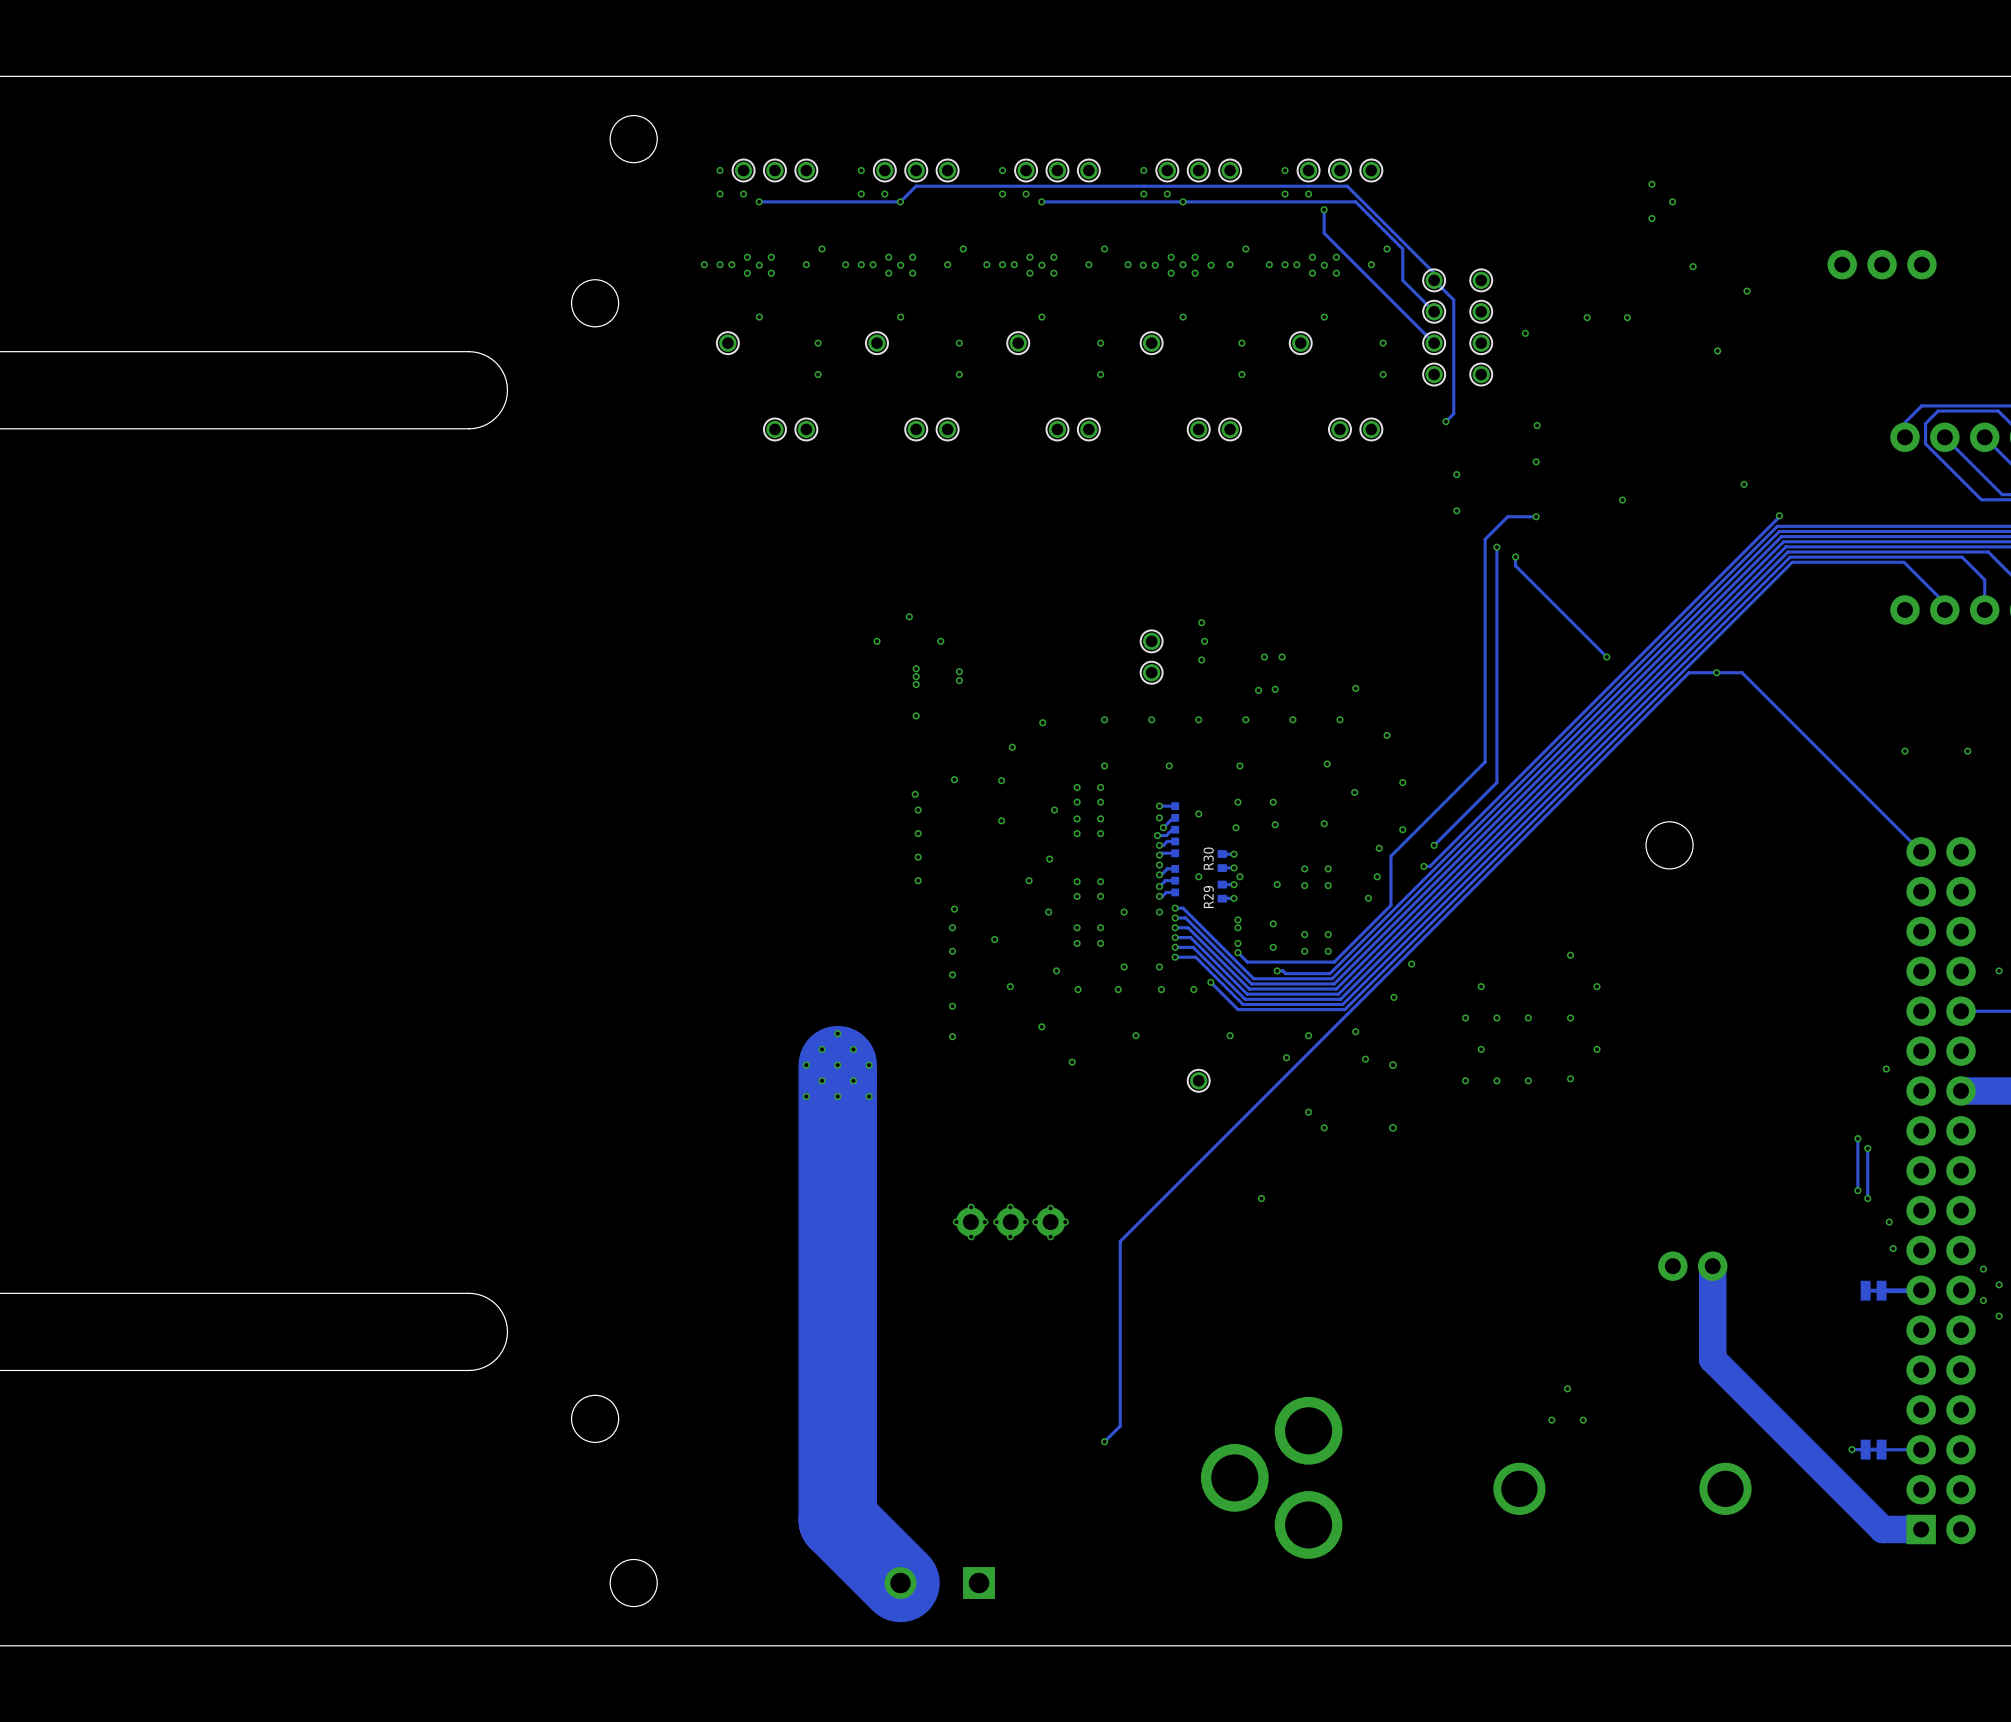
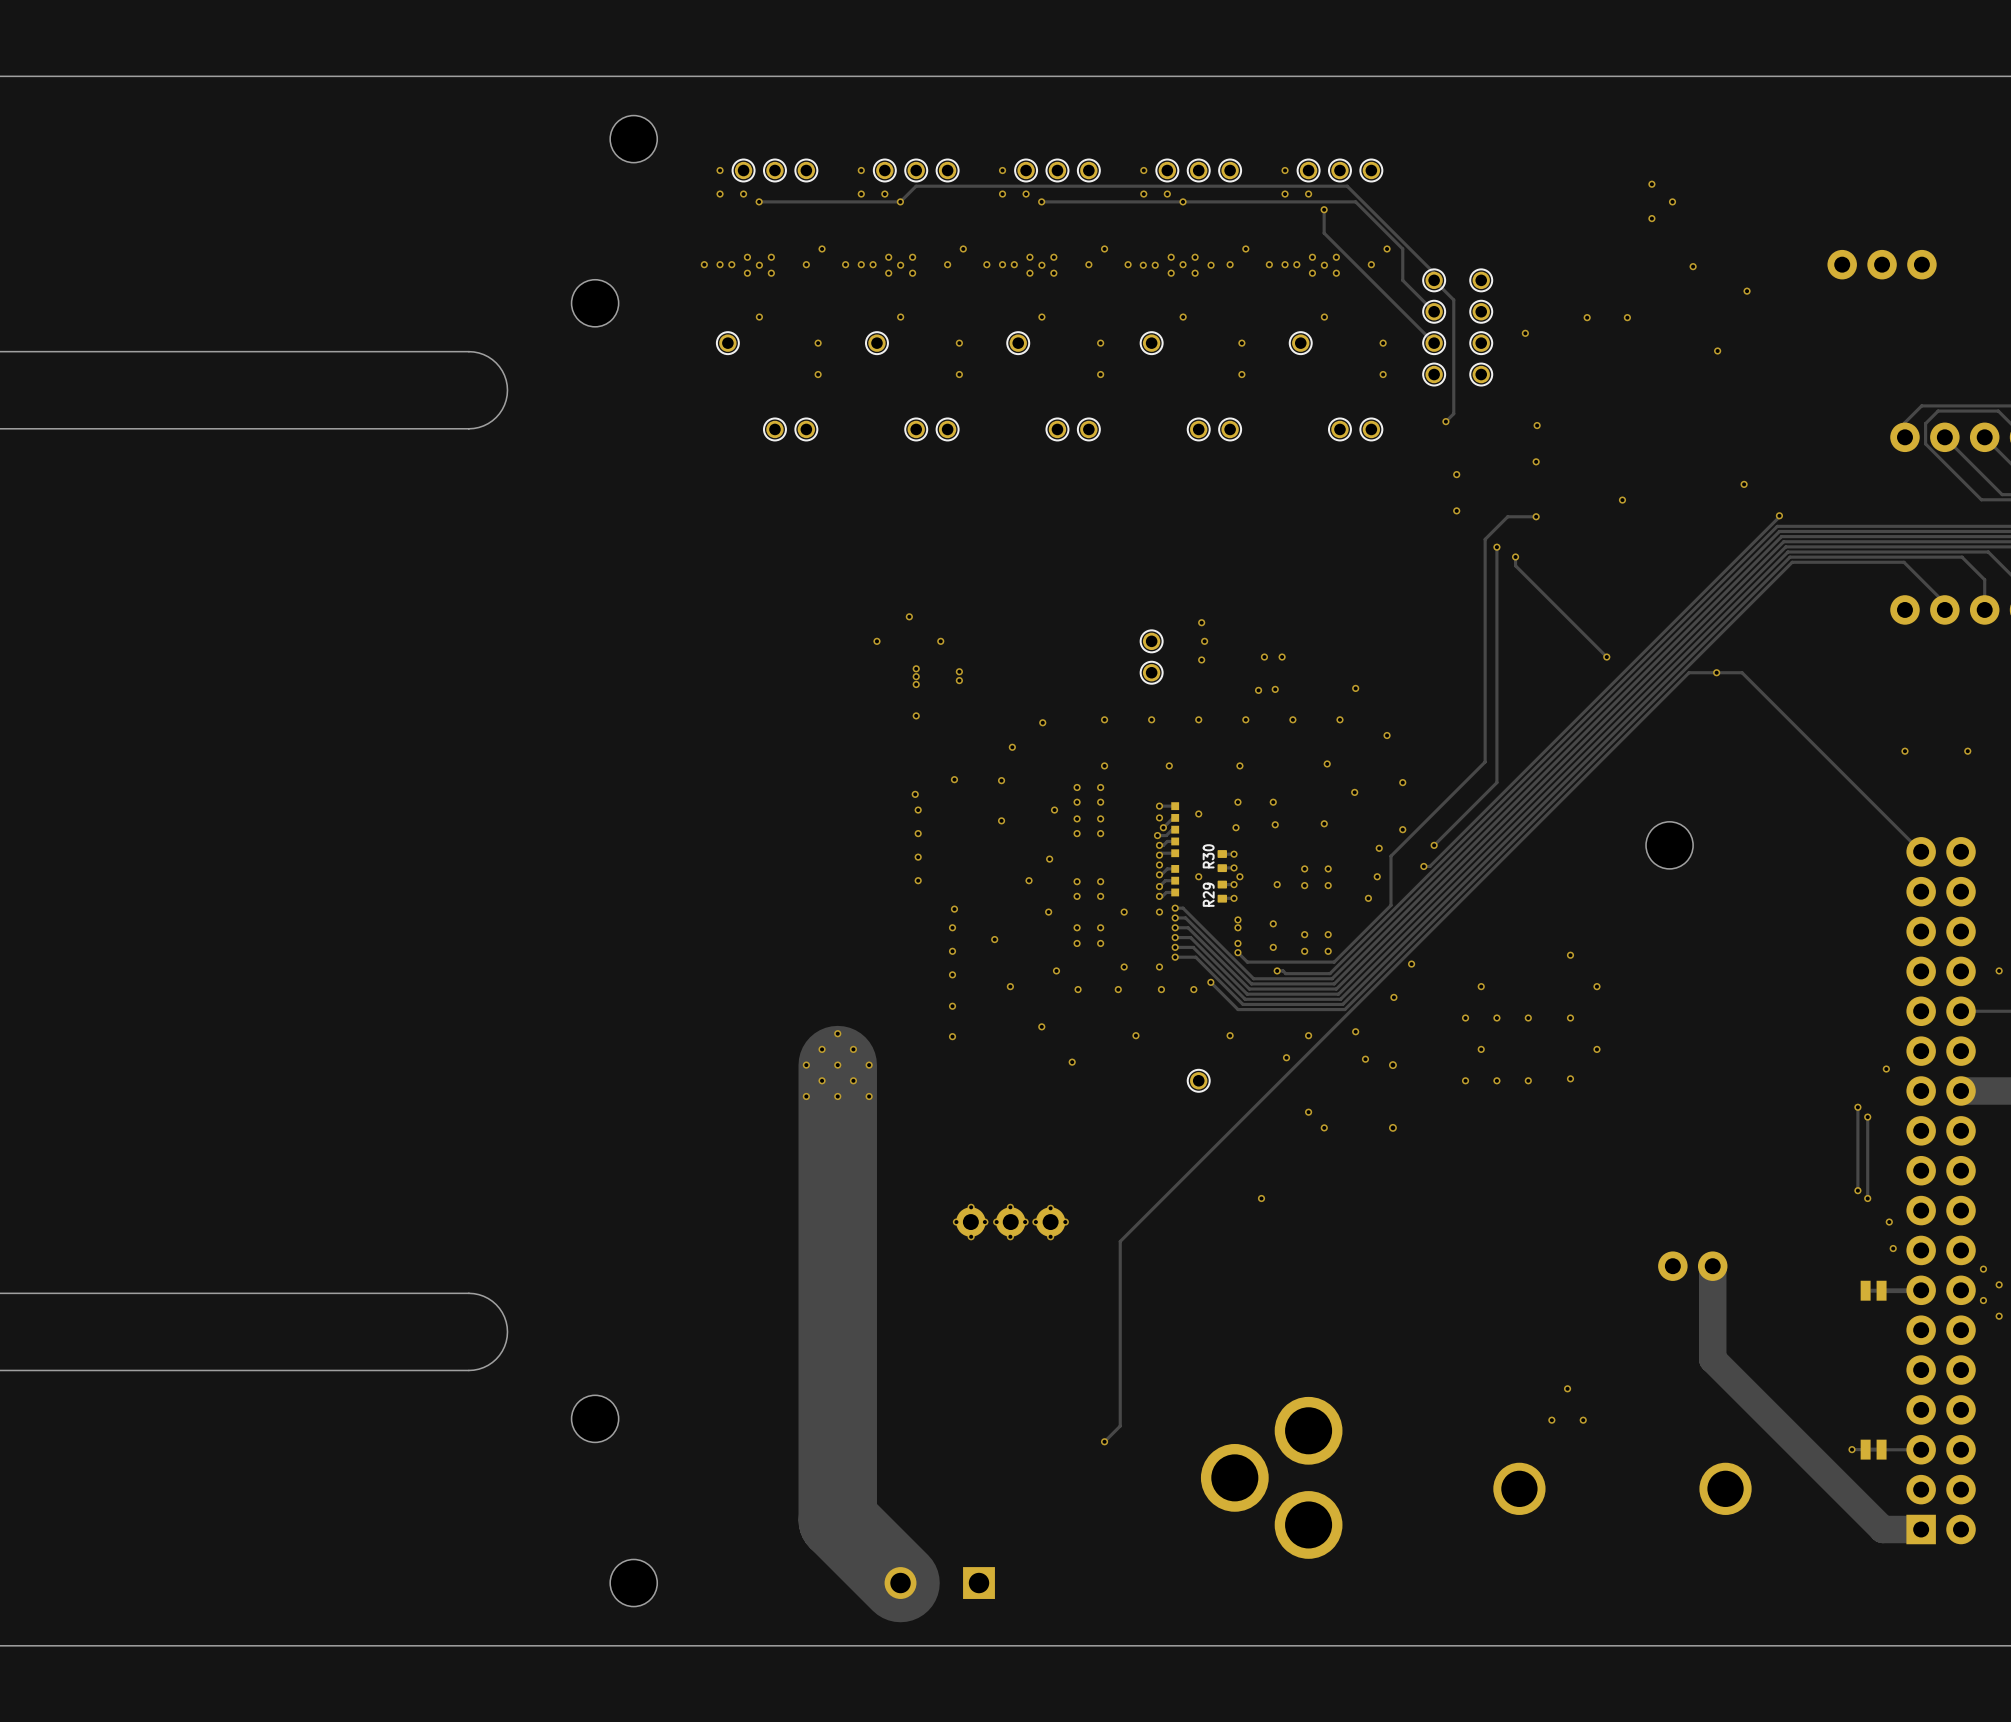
track: none -> (1857, 1107) (1857, 1138)
via: none -> (1857, 1107)
track: none -> (1867, 1117) (1867, 1148)
via: none -> (1867, 1117)
via: (1857, 1138) -> none
via: (1867, 1148) -> none

